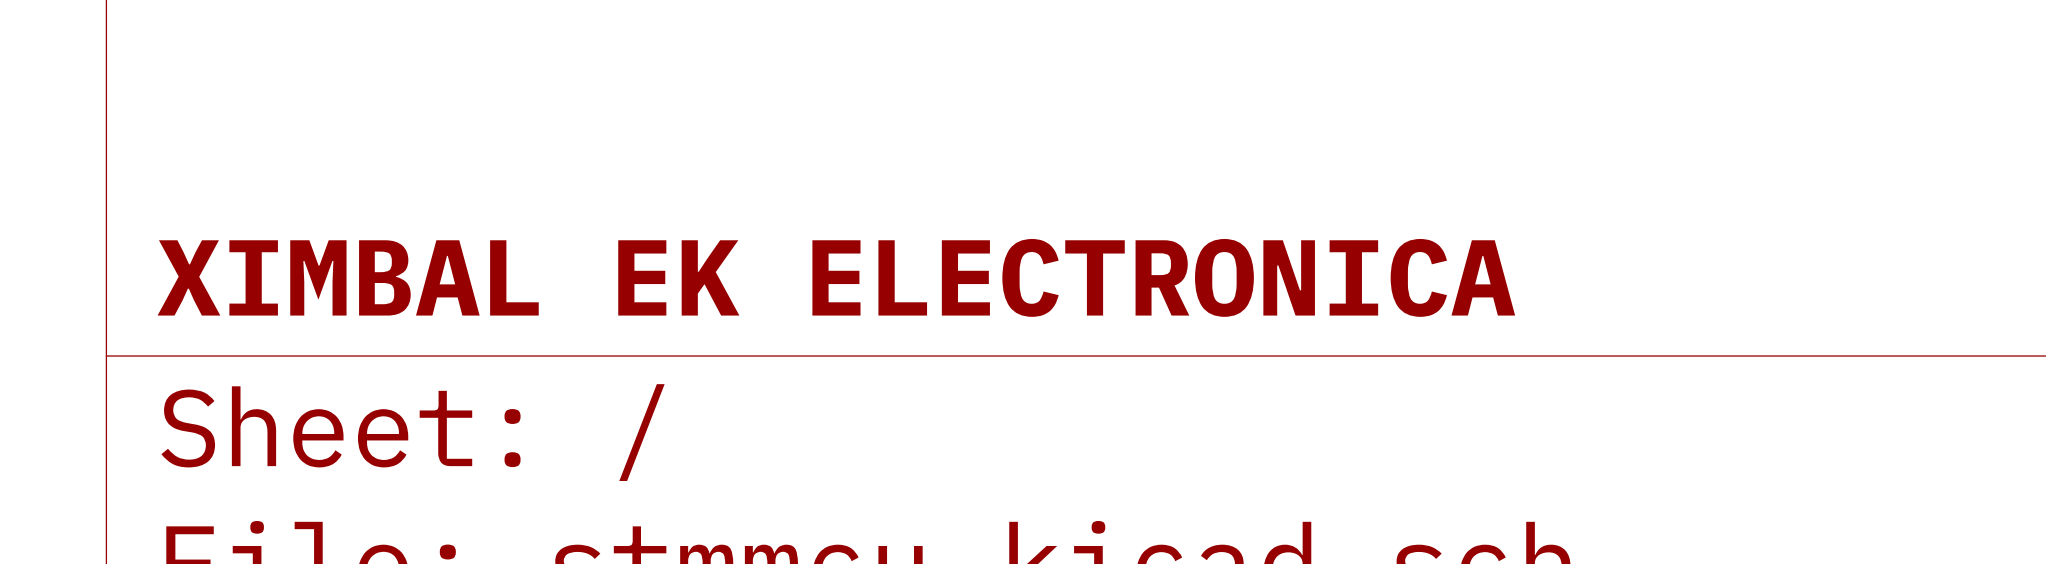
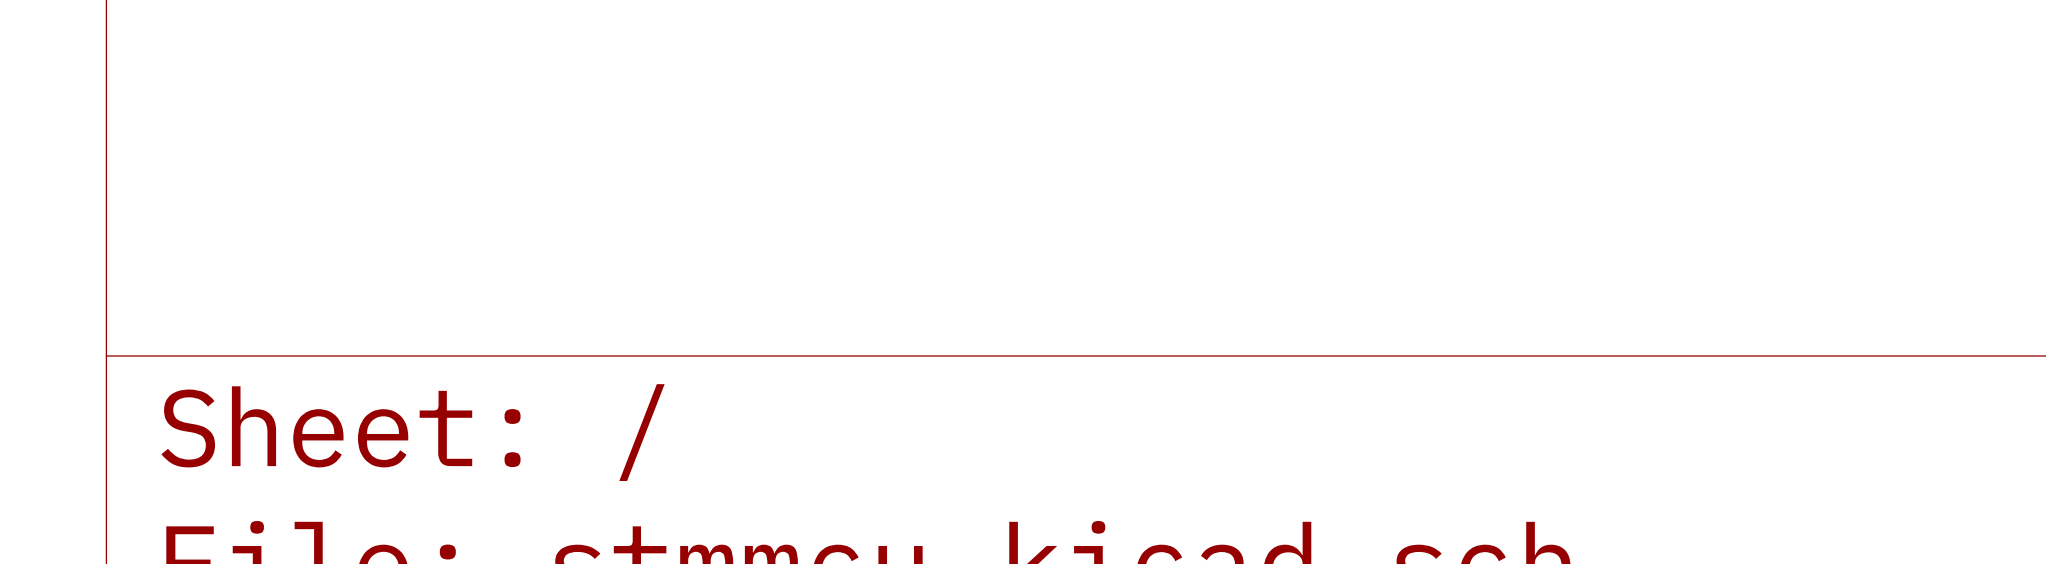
title block: XIMBAL EK ELECTRONICA (836, 277) -> none

